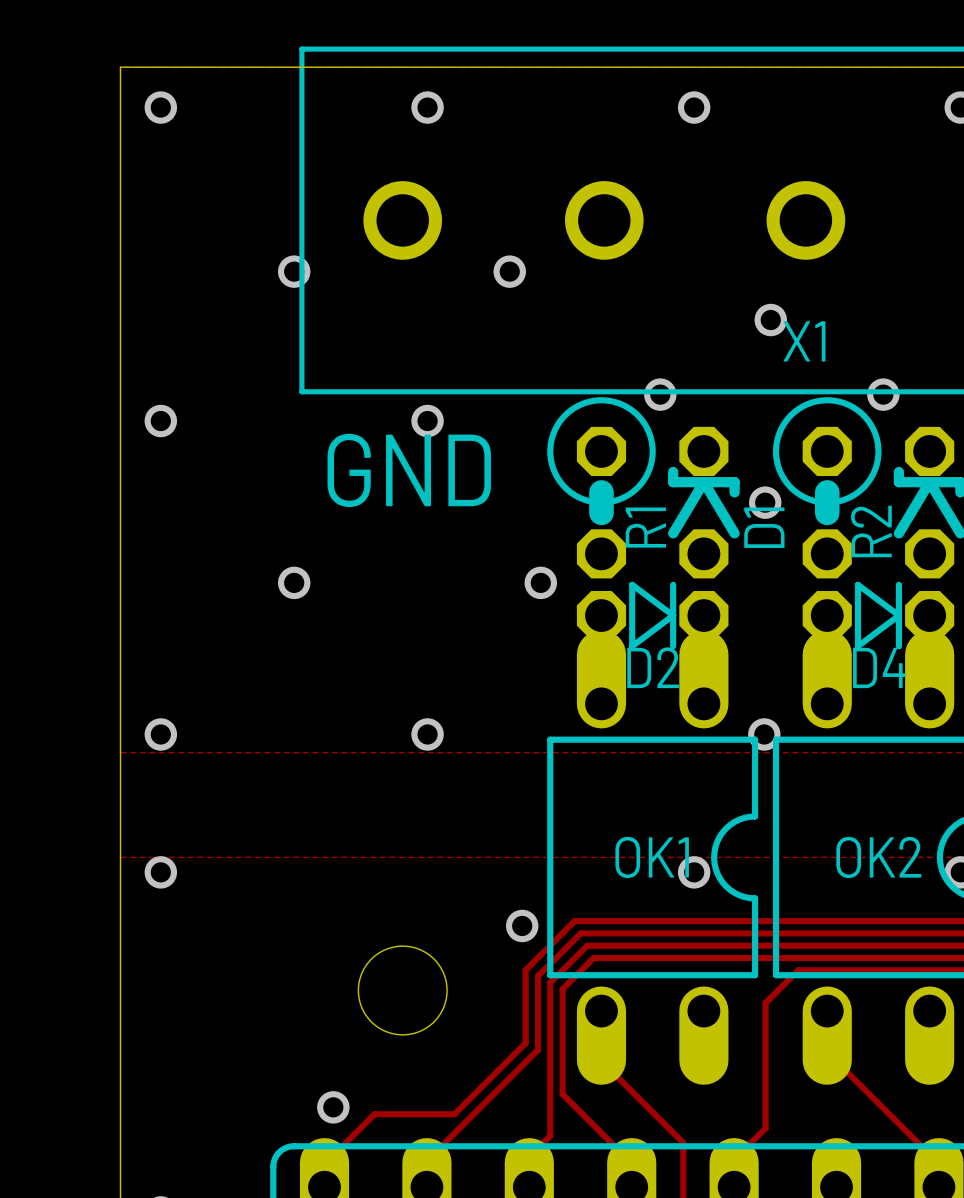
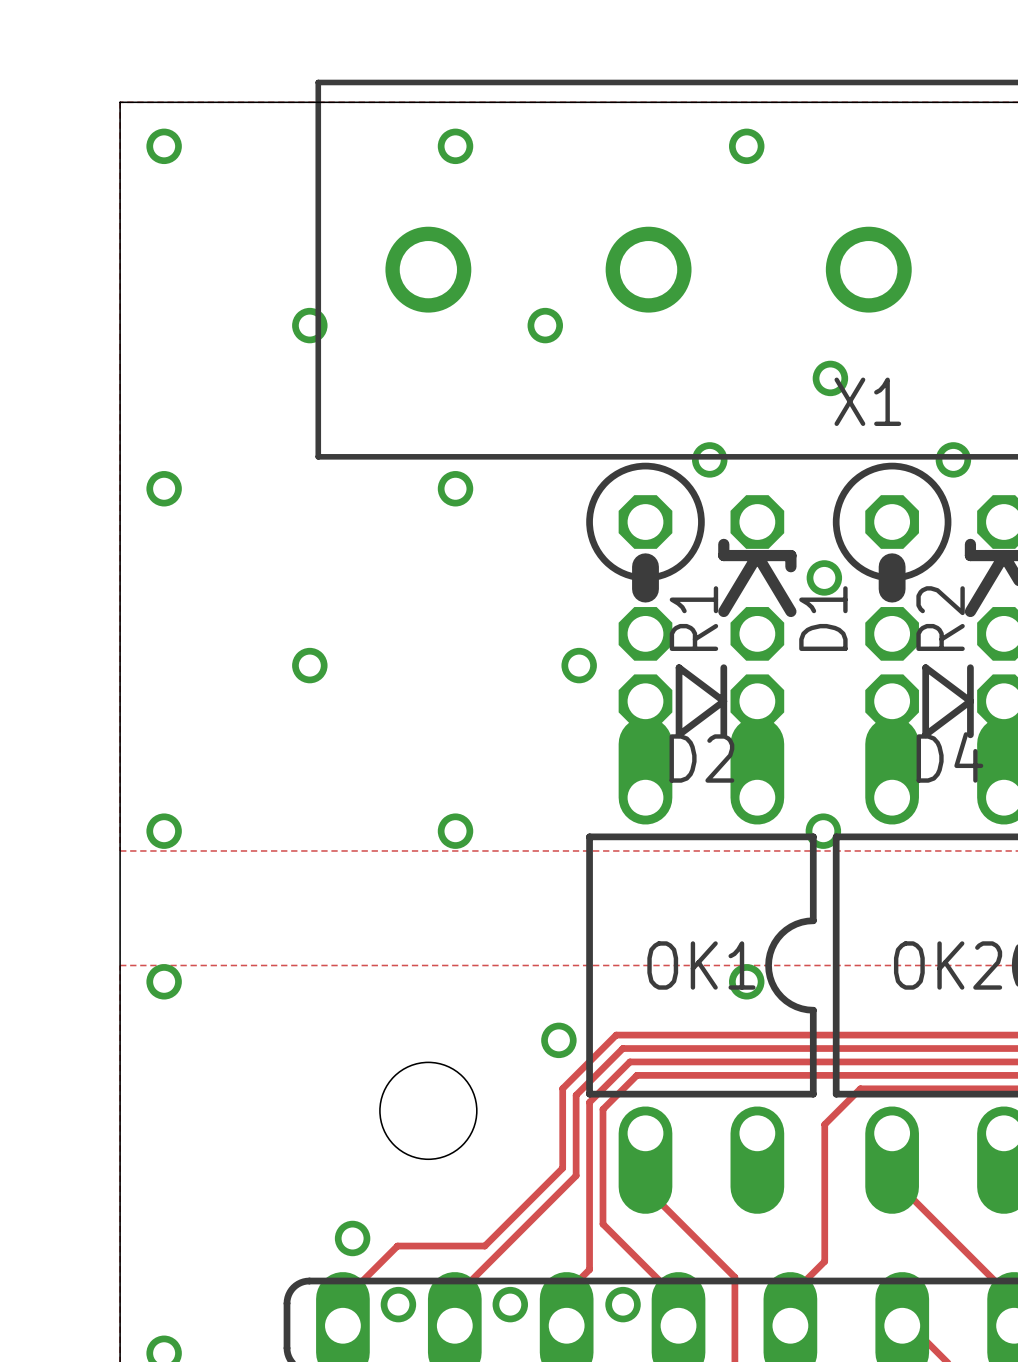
text: GND (409, 470) -> none
via: none -> (398, 1304)
via: none -> (510, 1304)
via: none -> (623, 1304)

